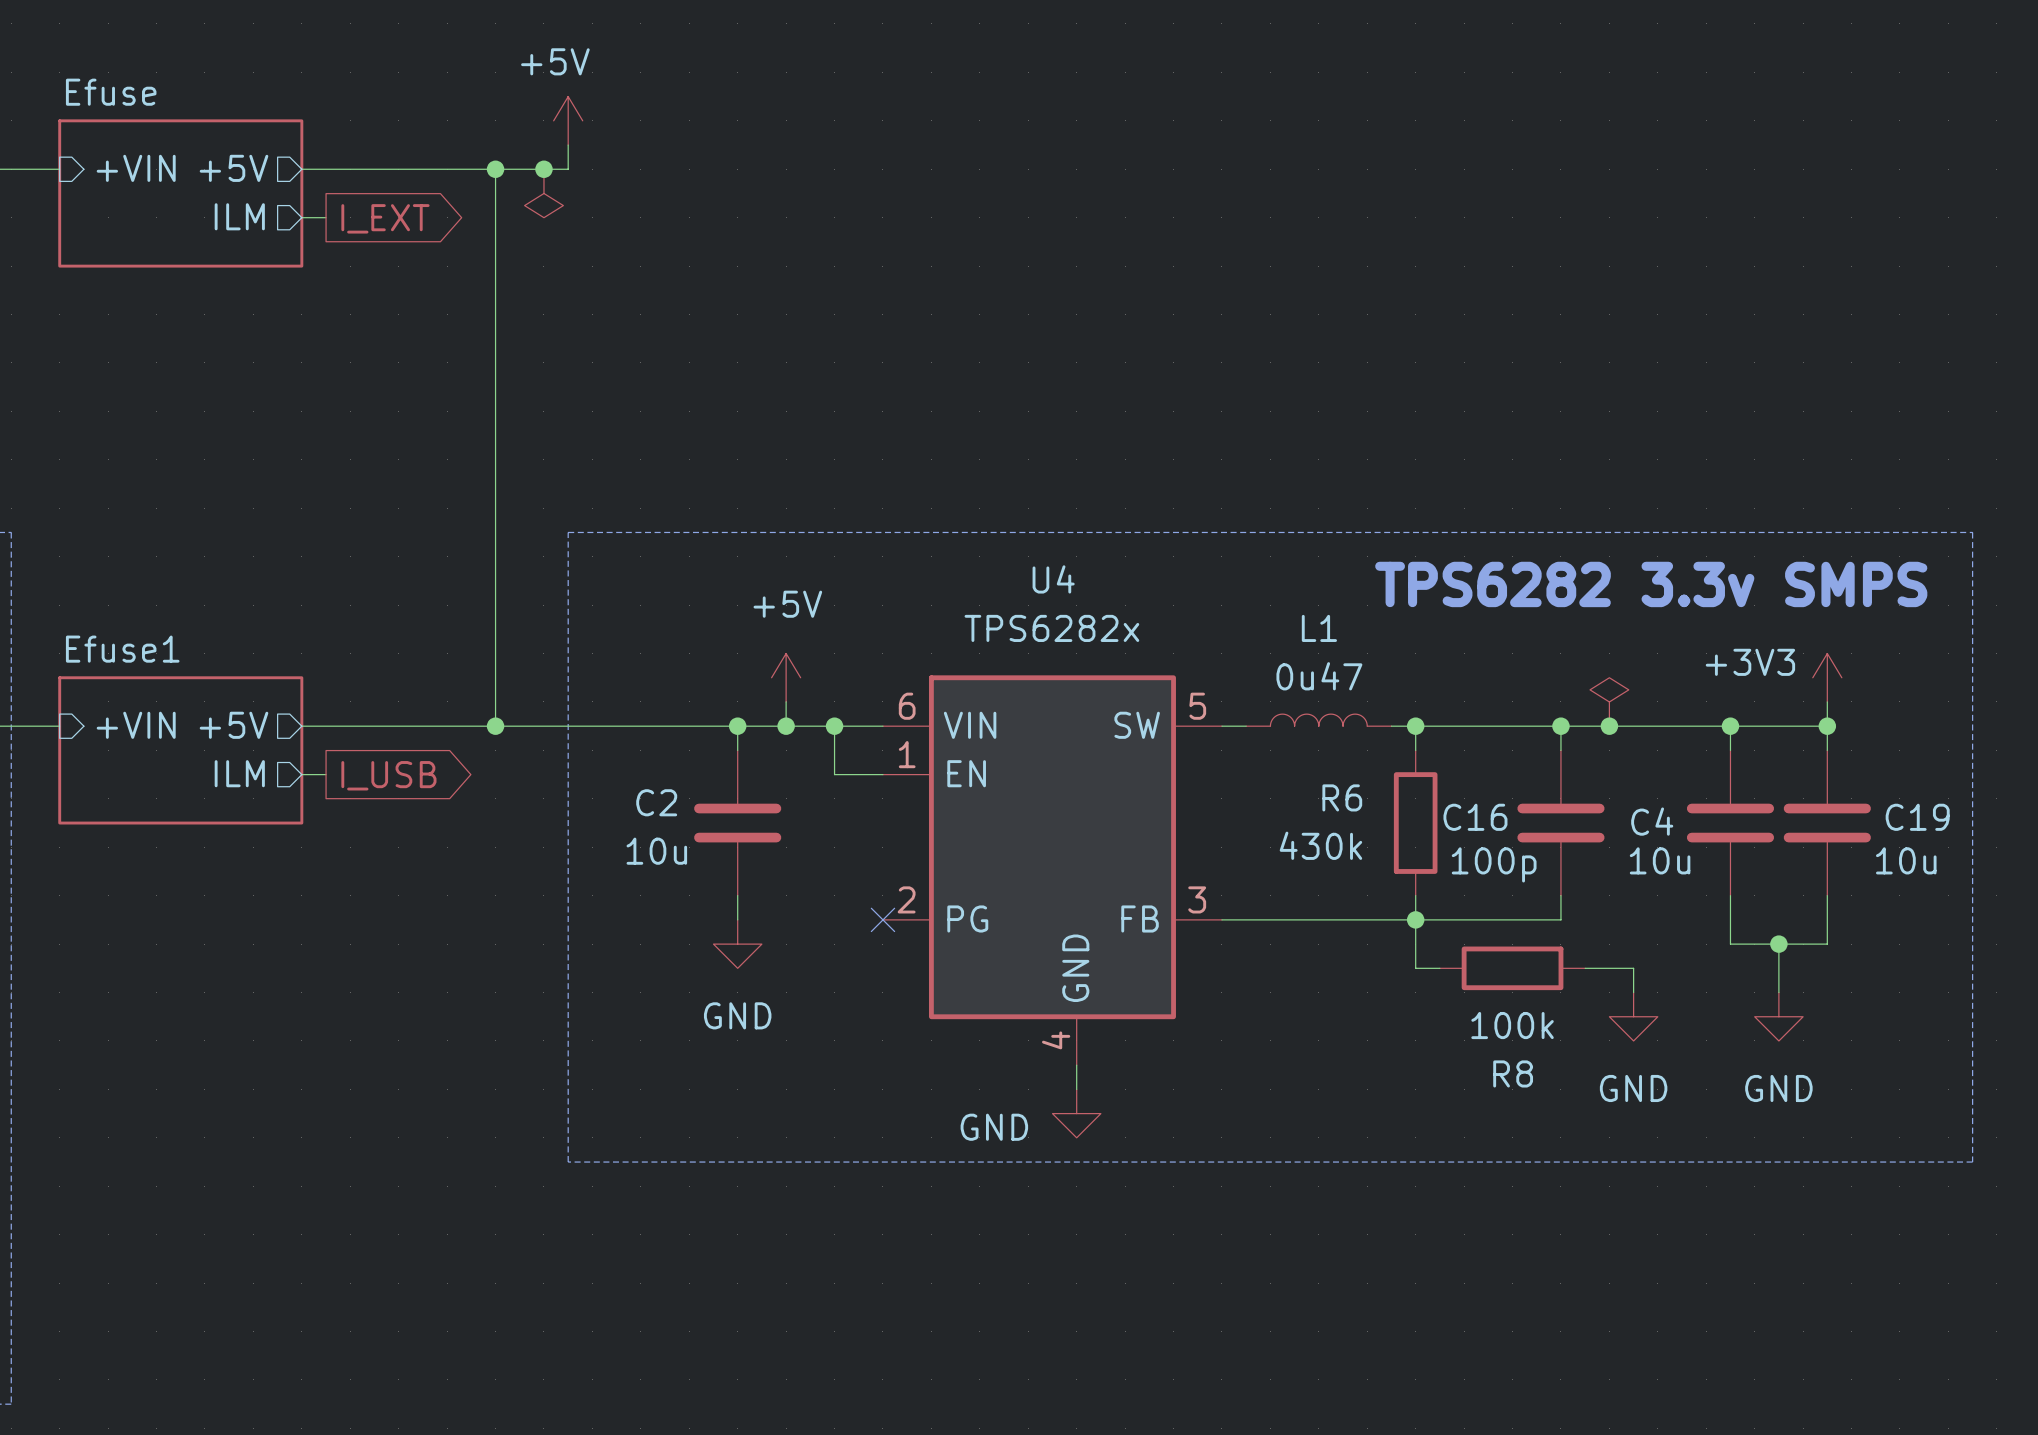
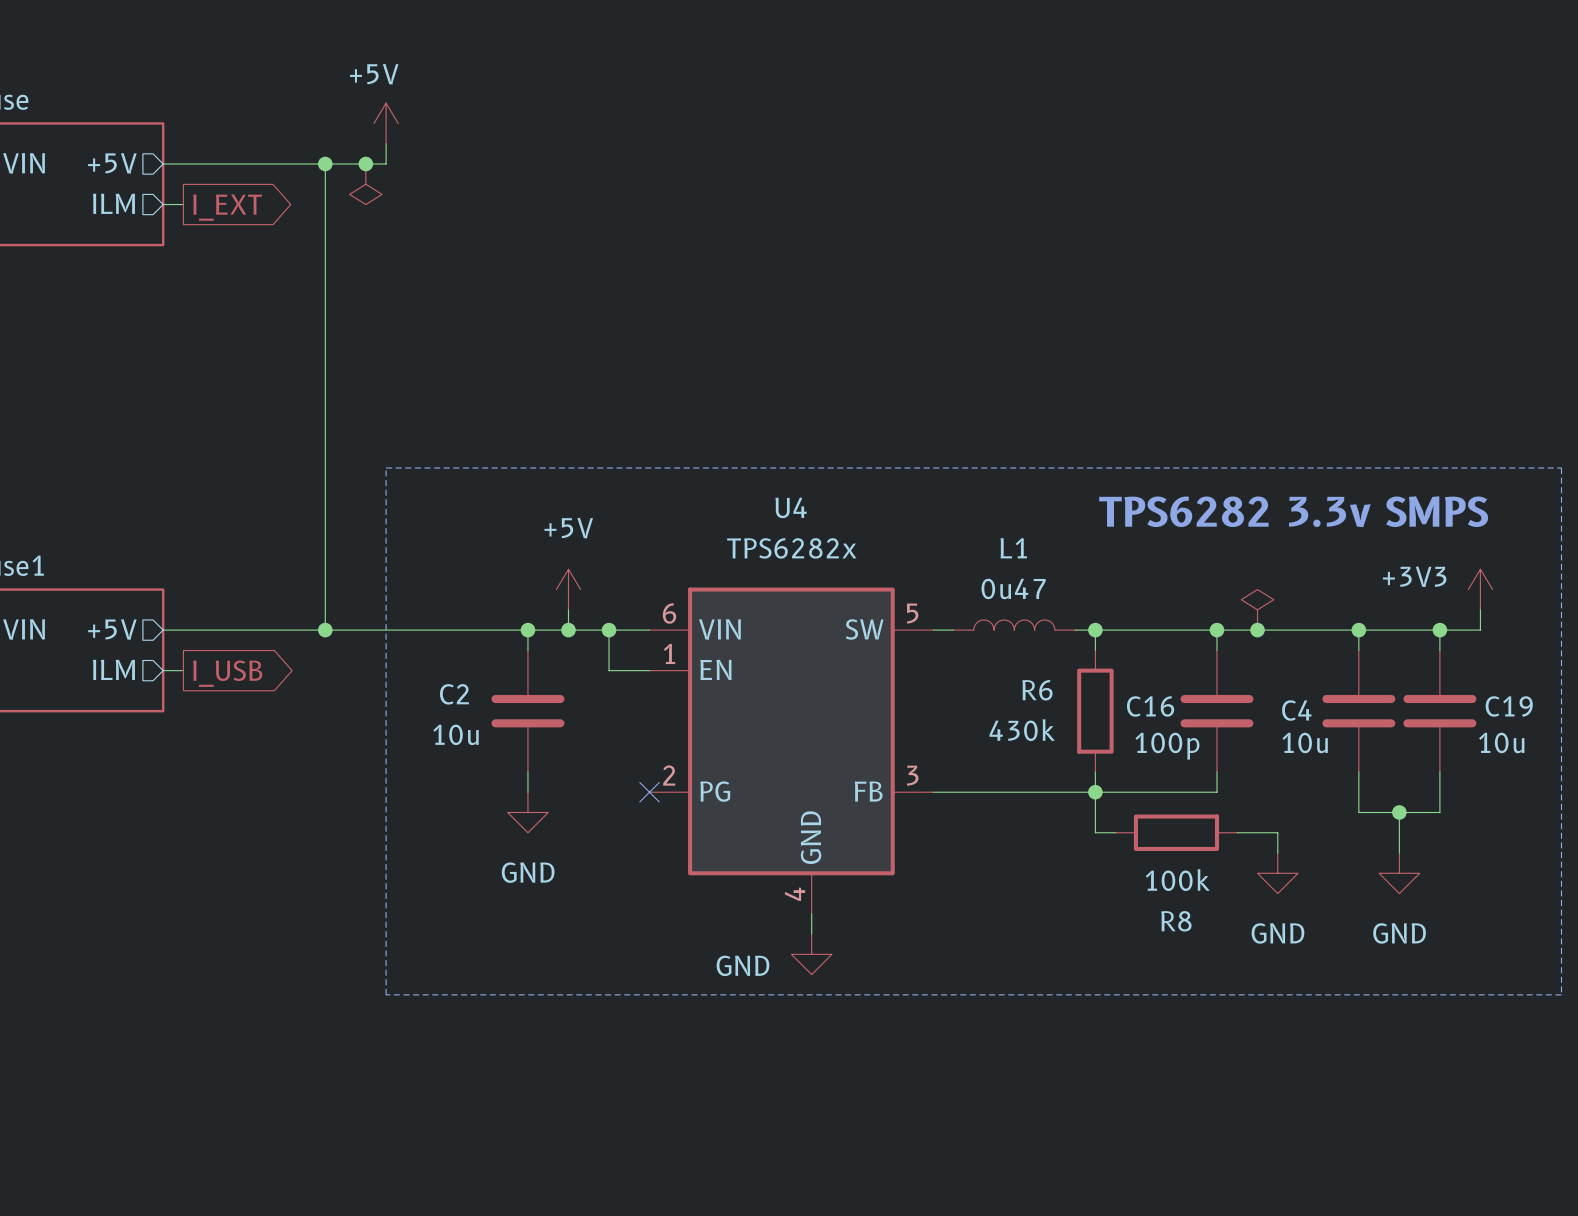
power symbol position: +3V3 (1827, 677) -> +3V3 (1480, 589)
wire: (1827, 701) (1827, 726) -> (1480, 609) (1480, 630) (1439, 630)

